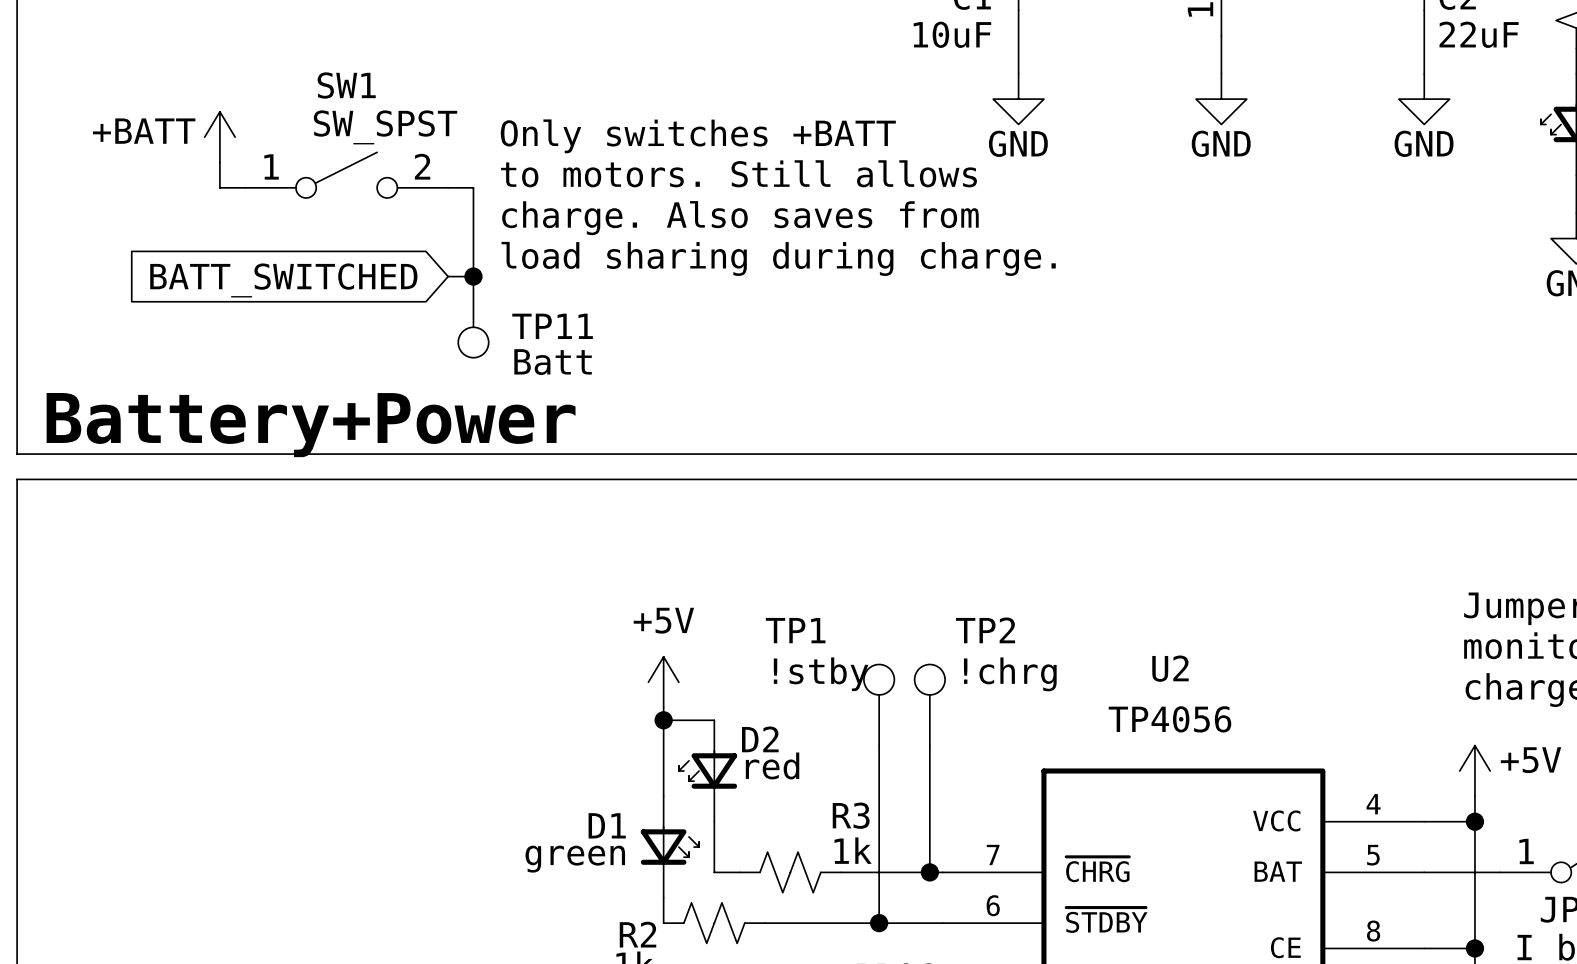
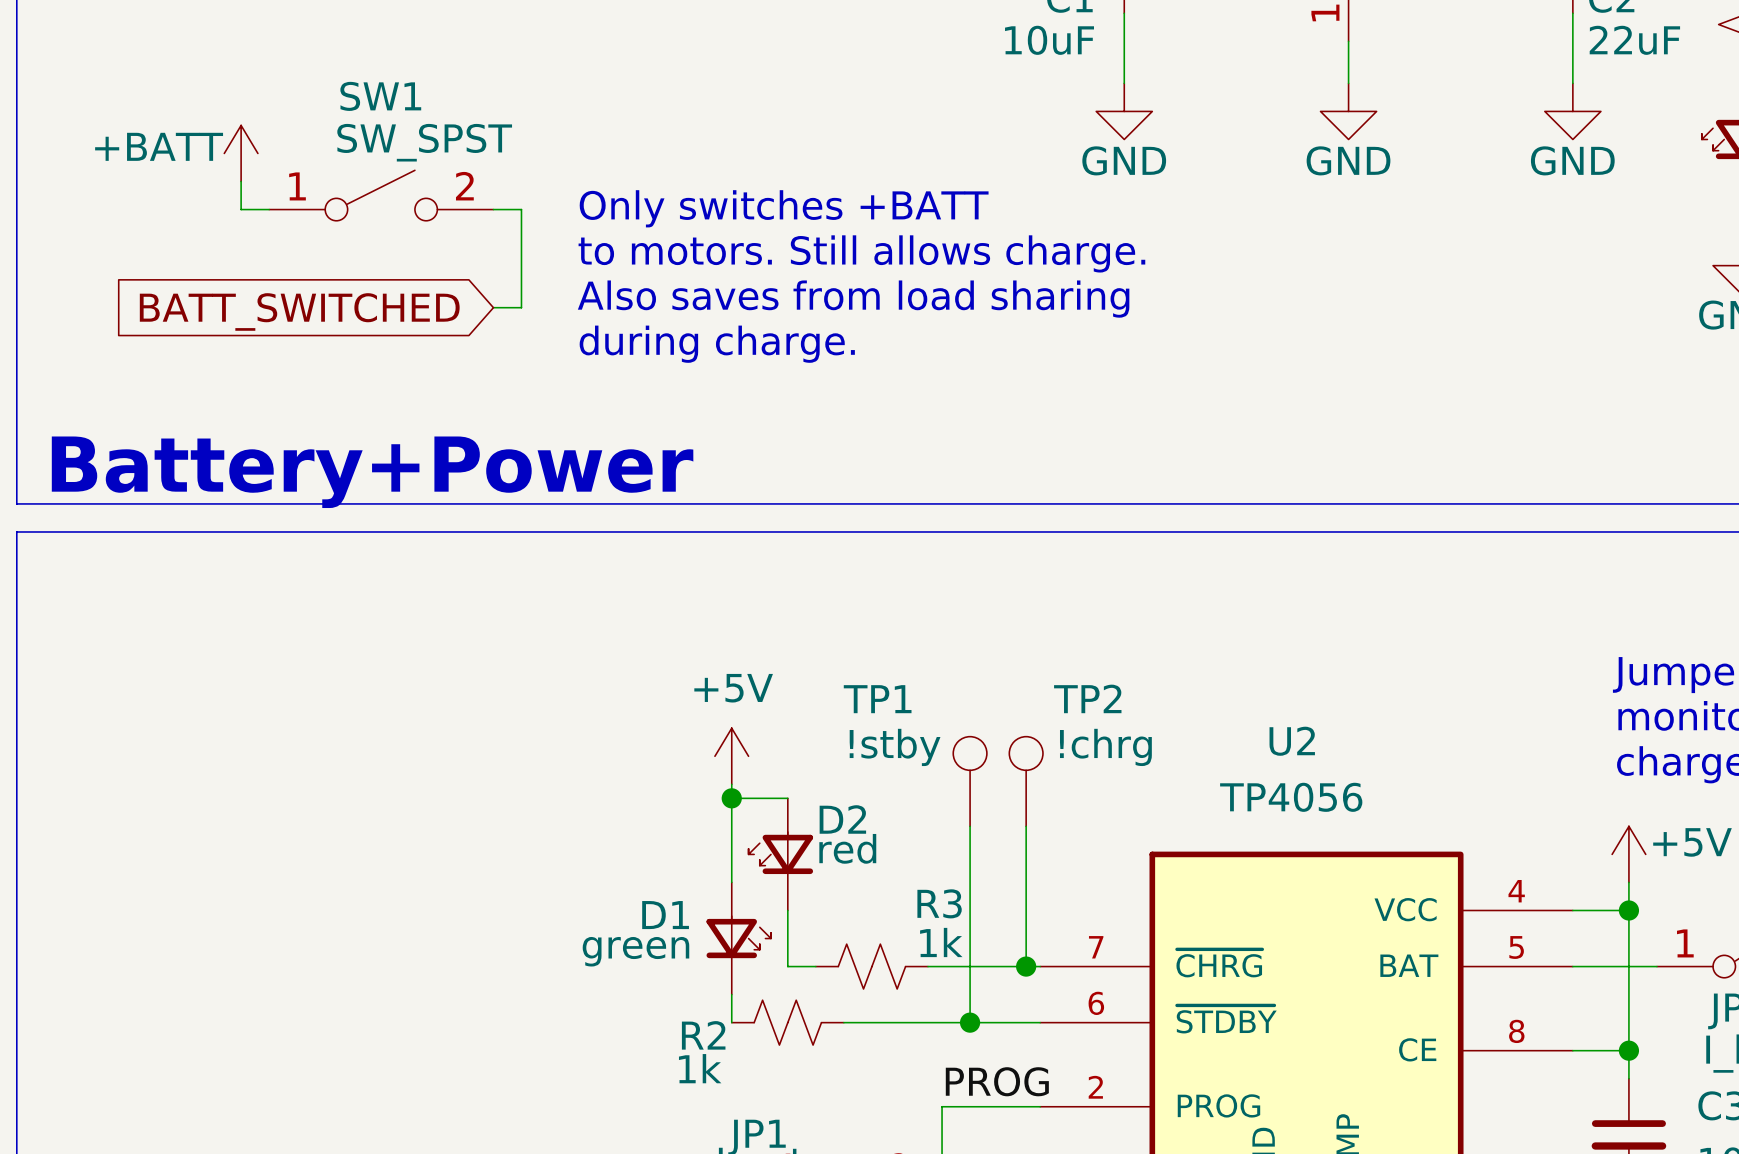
text position: Only switches +BATT (698, 136) -> Only switches +BATT (784, 208)
text: to motors. Still allows (738, 173) -> to motors. Still allows charge. (861, 253)
text: charge. Also saves from (740, 218) -> none
text: load sharing during charge. (778, 258) -> during charge. (717, 344)
text: none -> Also saves from load sharing (853, 299)
junction: (473, 276) -> none
TP11: Batt (473, 317) -> none

